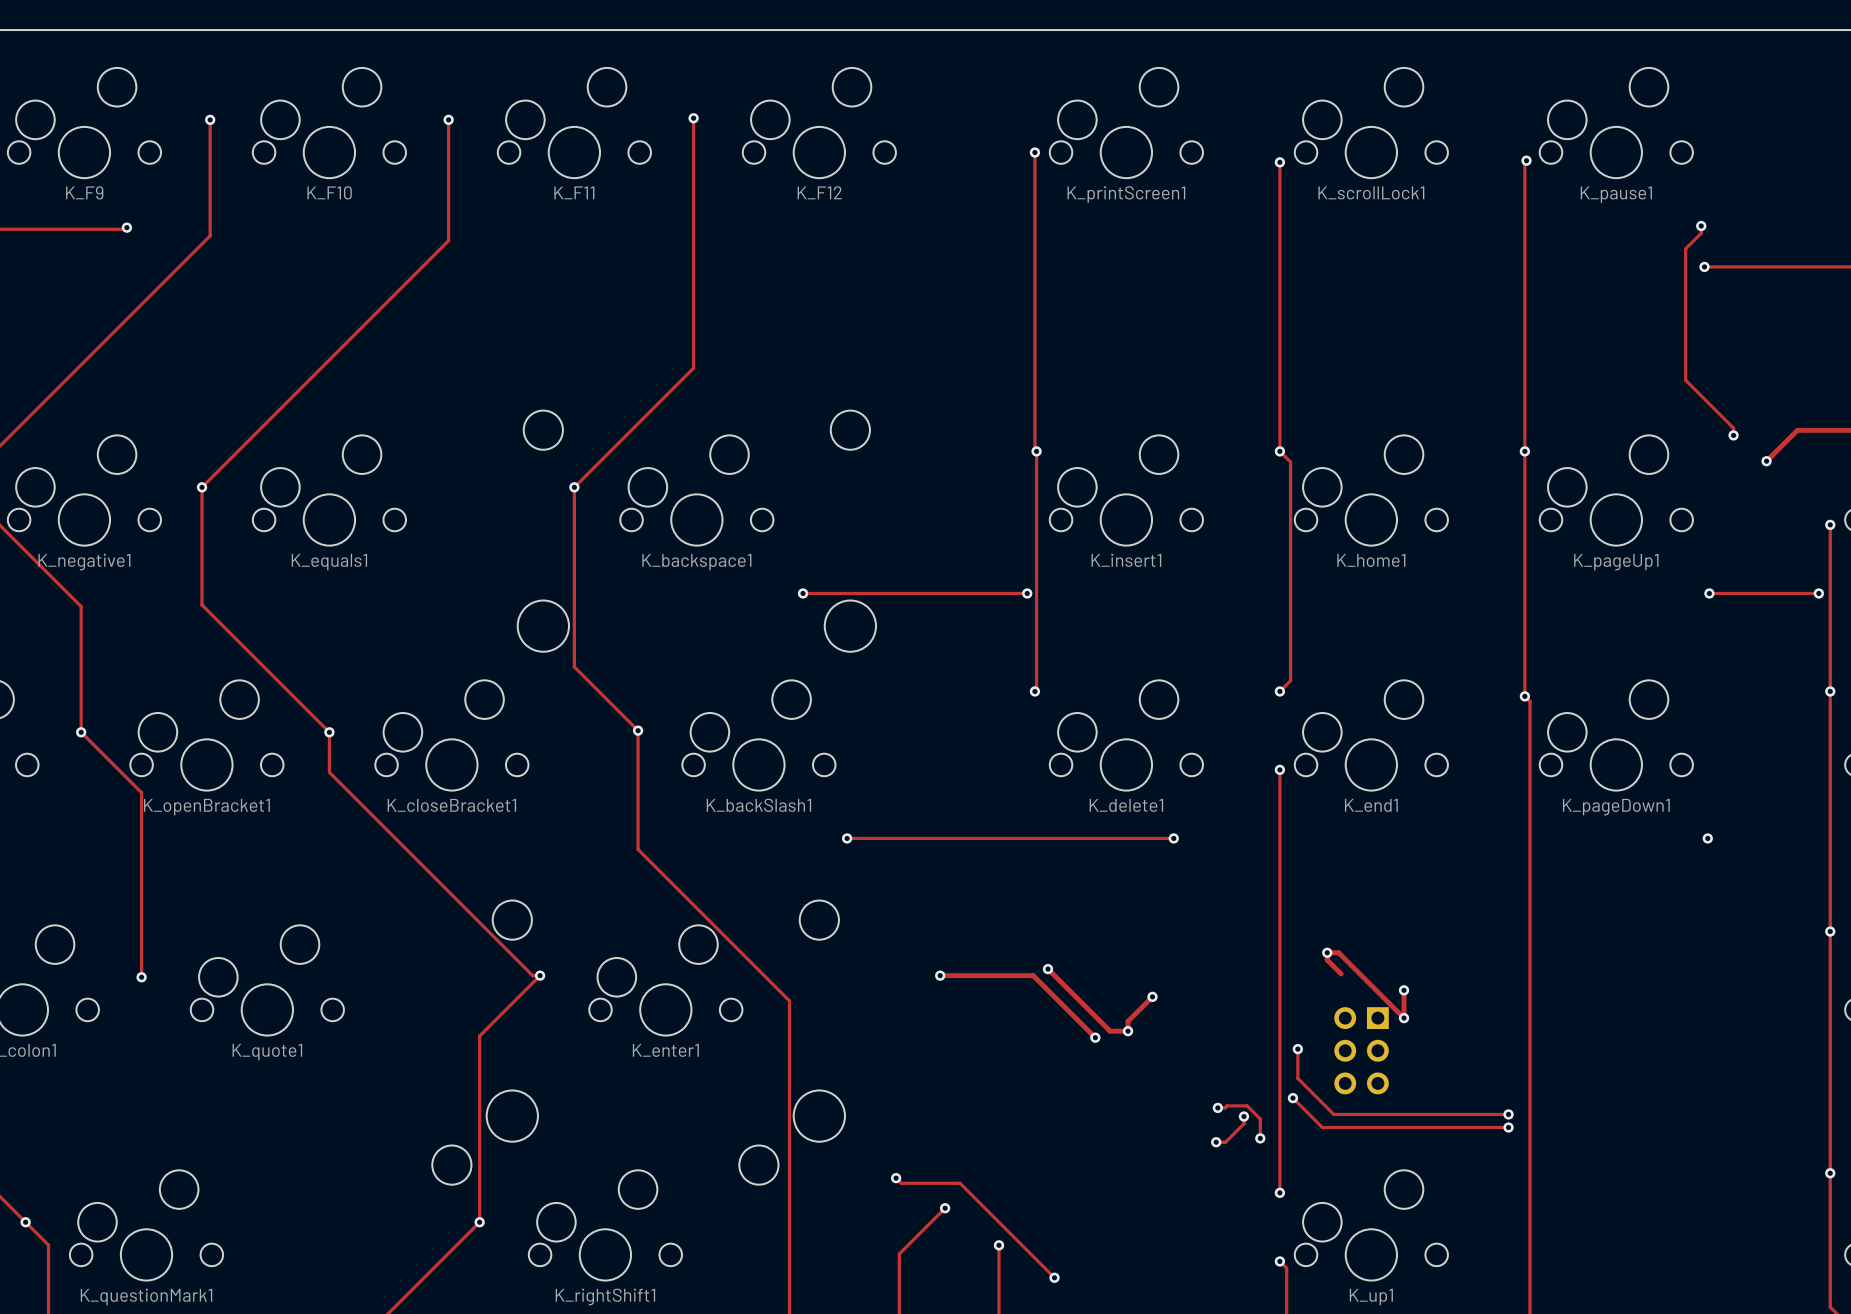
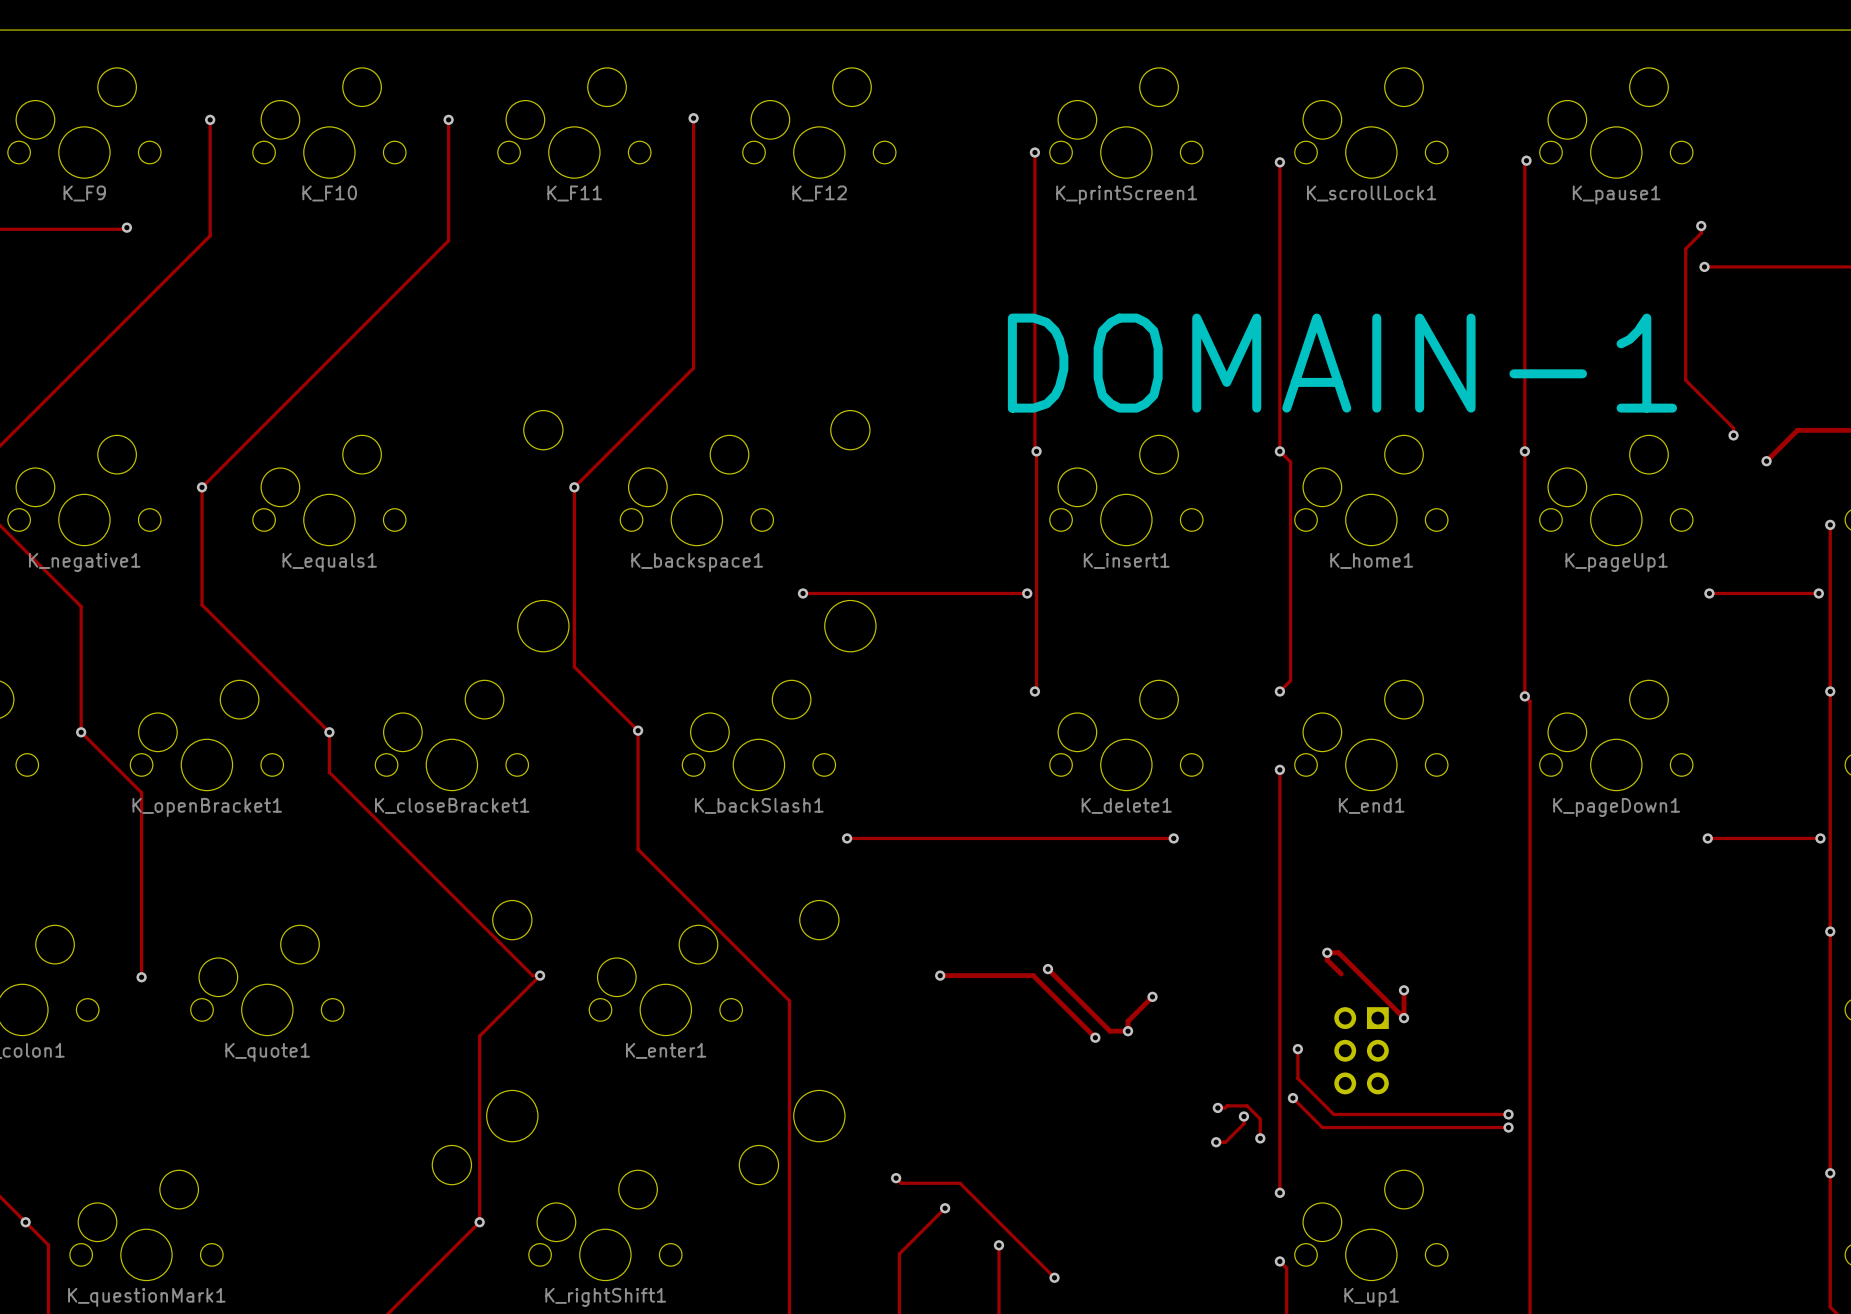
text: none -> DOMAIN-1 (1342, 363)
track: none -> (1707, 838) (1820, 838)
via: none -> (1820, 838)

